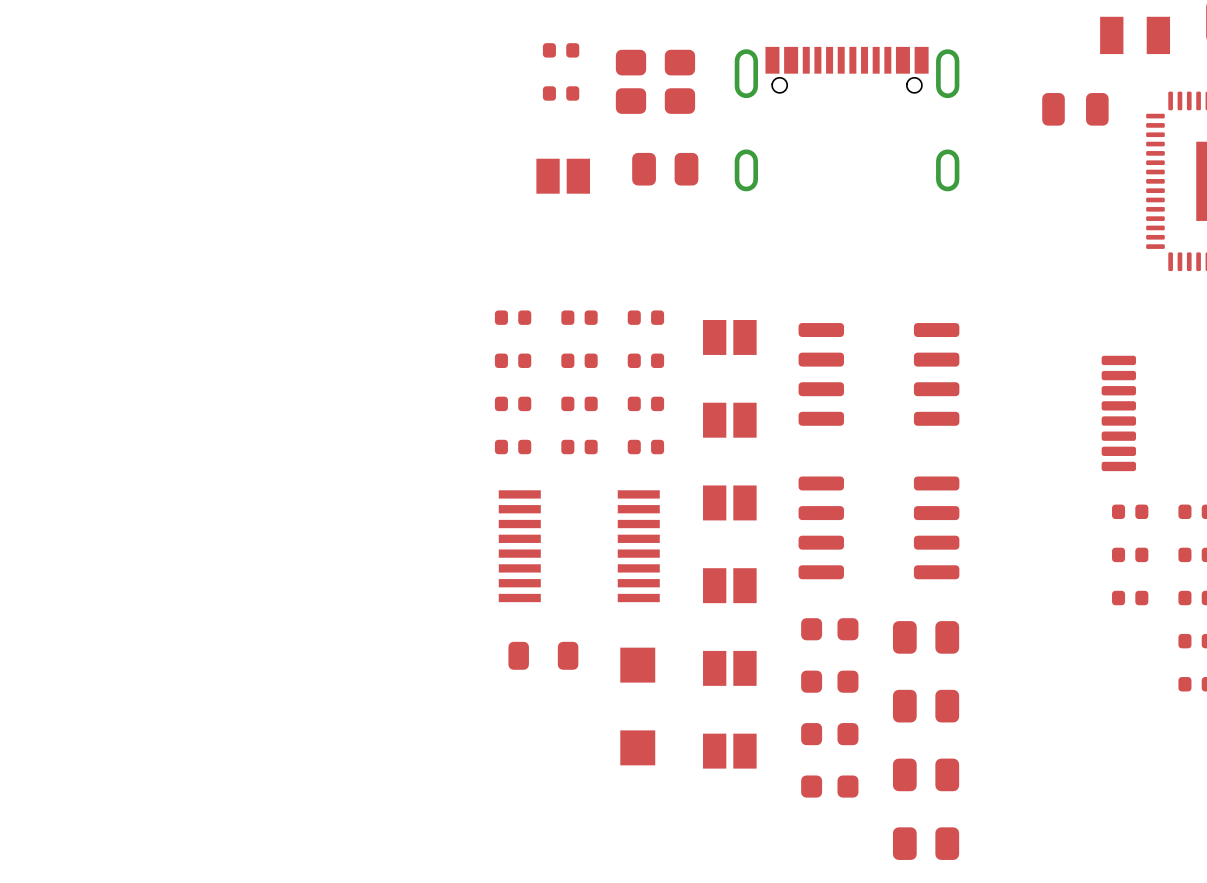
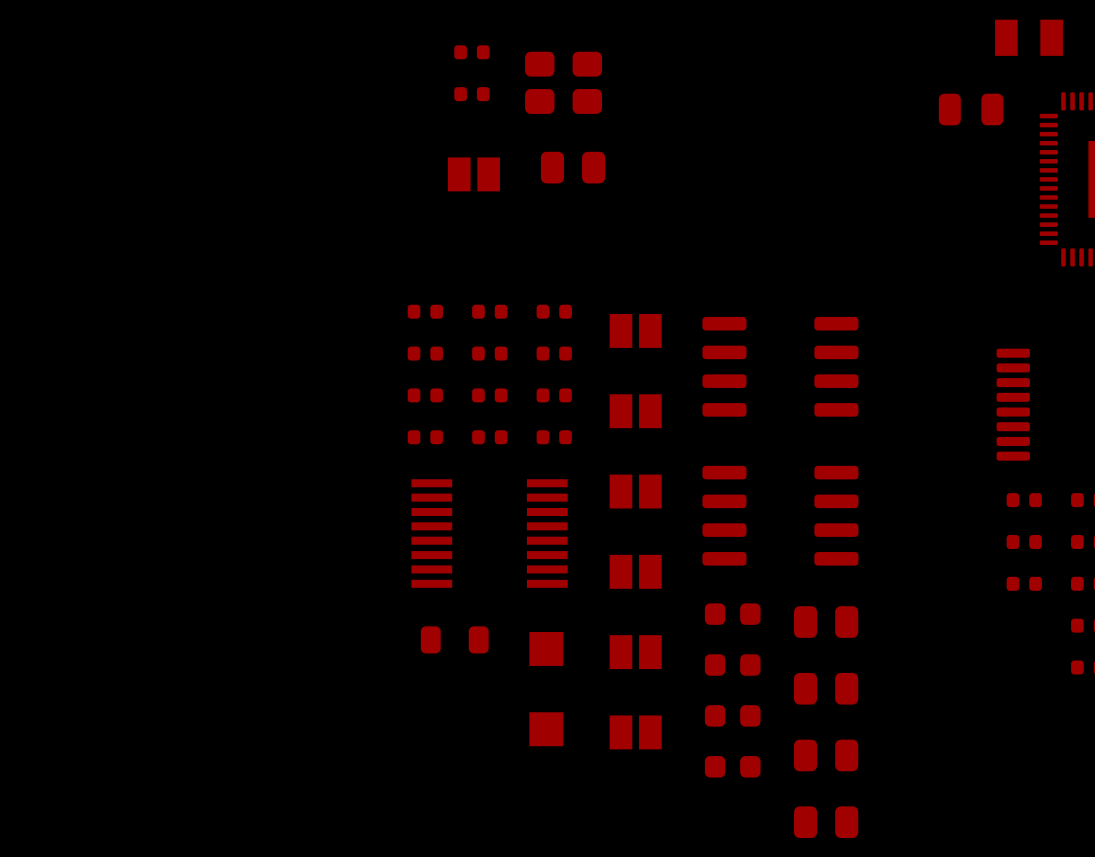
part: (847, 119) -> none

